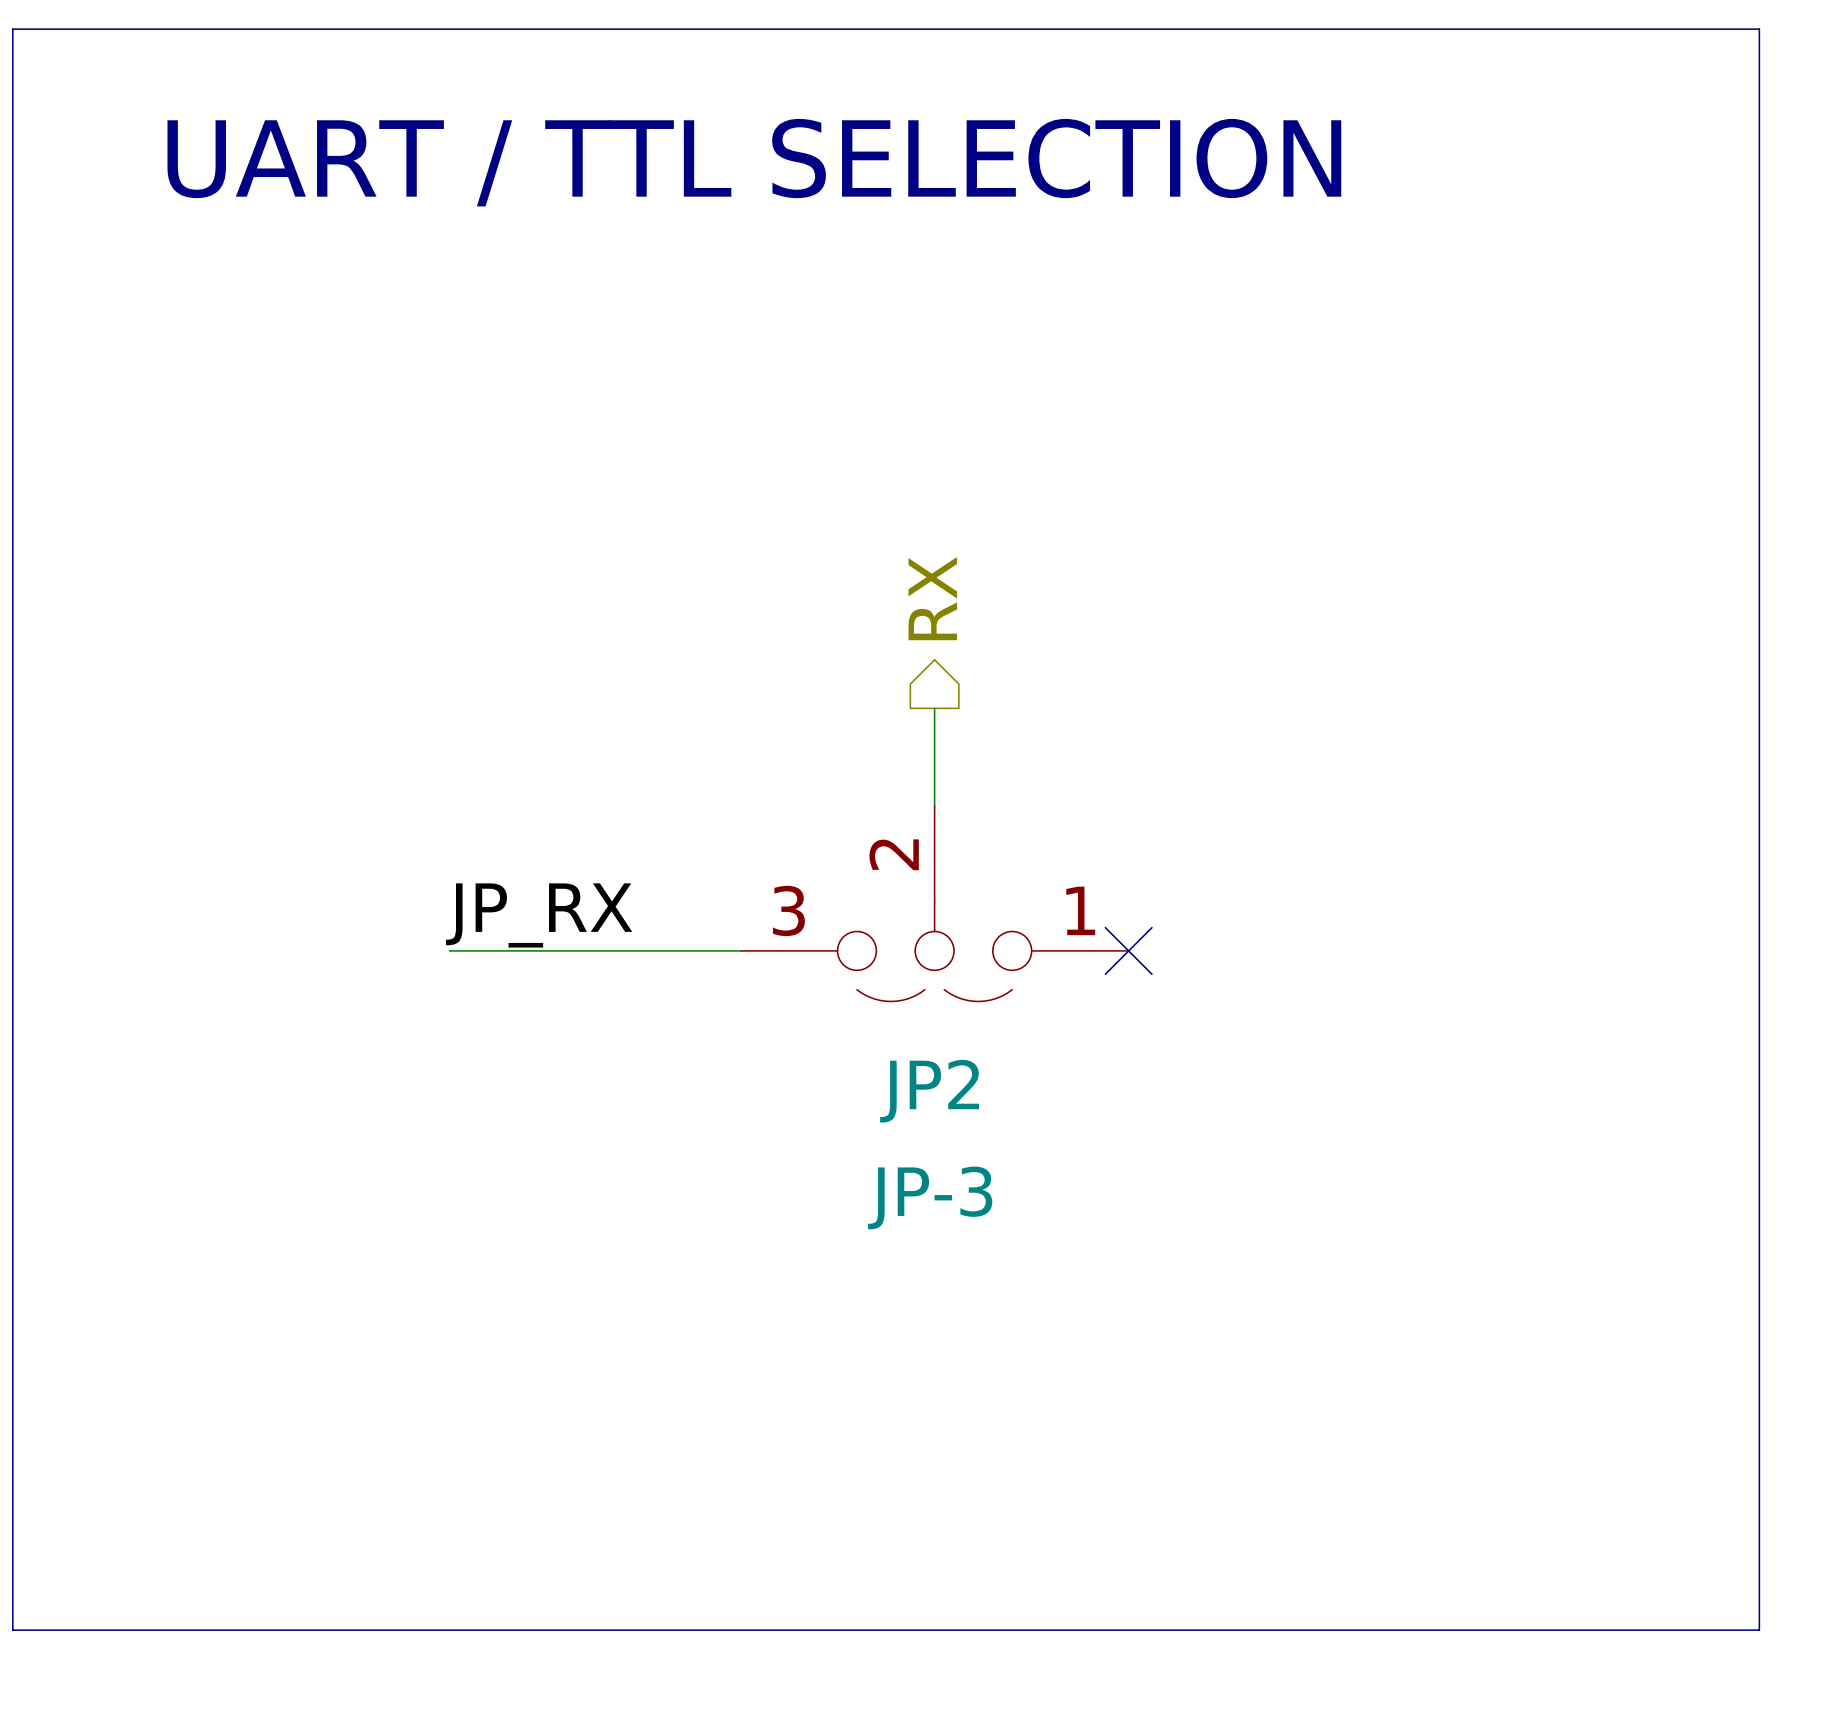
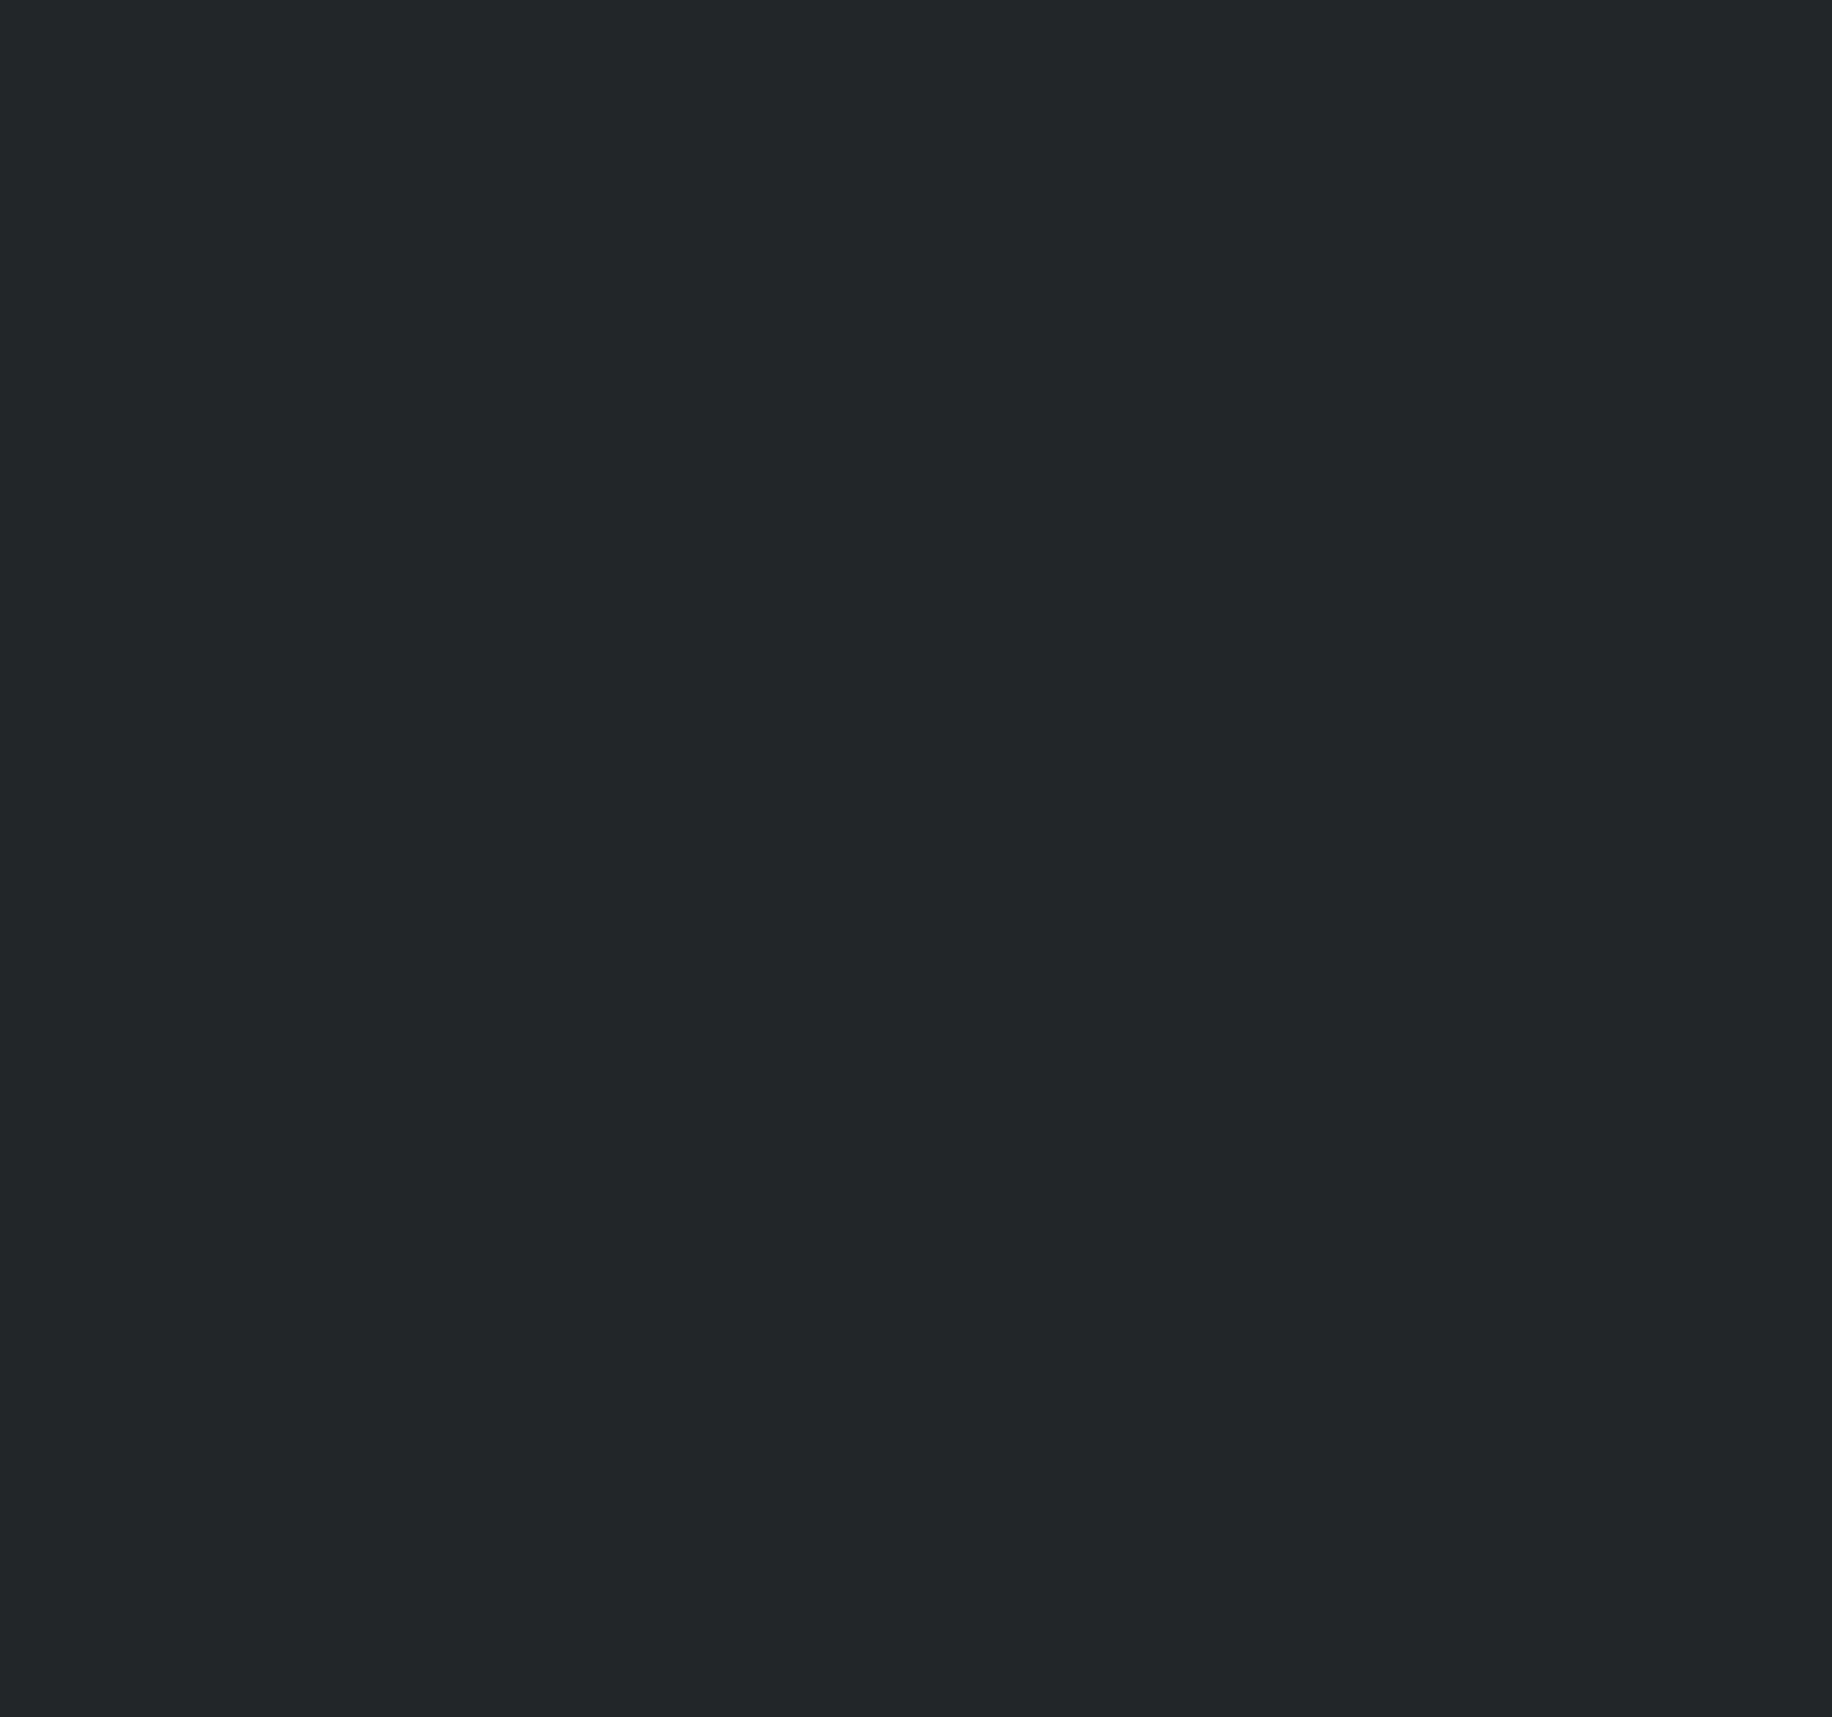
line: (12, 29) (1759, 29) (1759, 1630) (12, 1630) (12, 29) -> none
text: UART / TTL SELECTION (754, 162) -> none
hierarchical label: RX (932, 598) -> none
wire: (934, 708) (934, 805) -> none
JP2: JP-3 (934, 903) -> none
label: JP_RX (539, 915) -> none
wire: (449, 950) (740, 950) -> none
no-connect mark: (1128, 950) -> none

